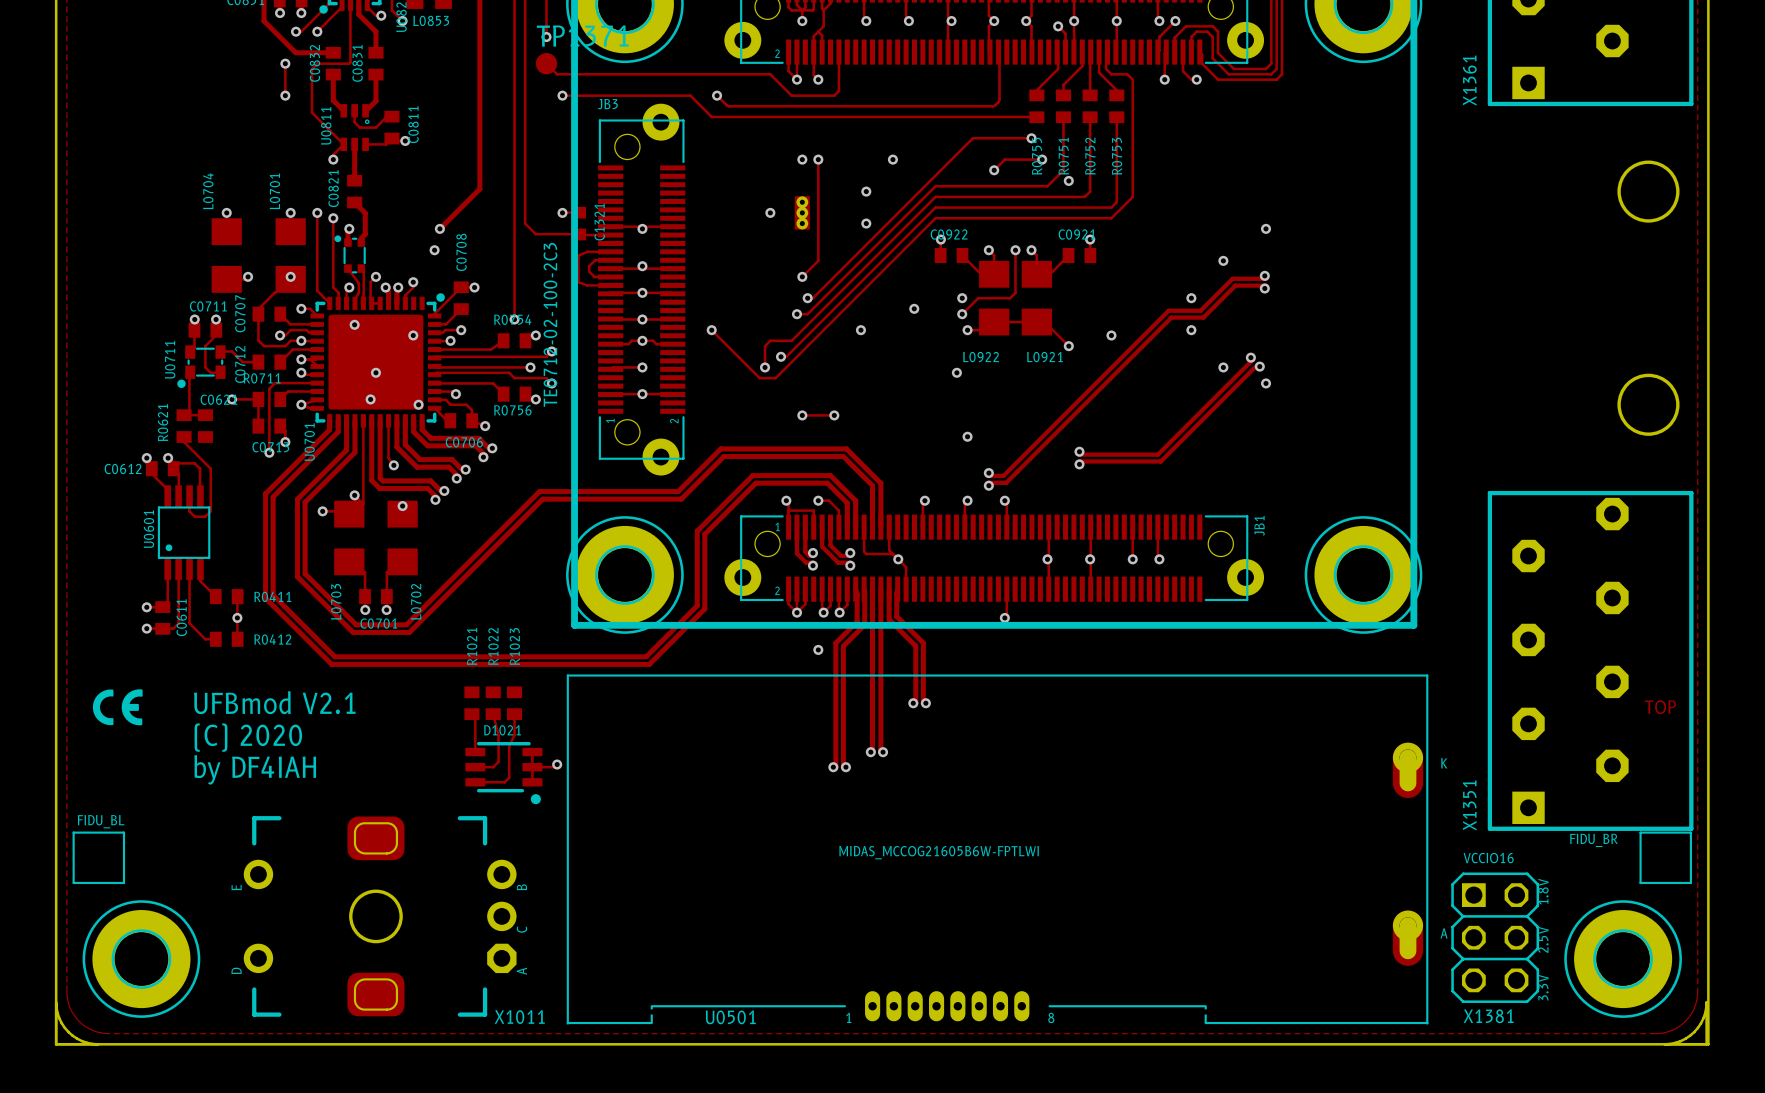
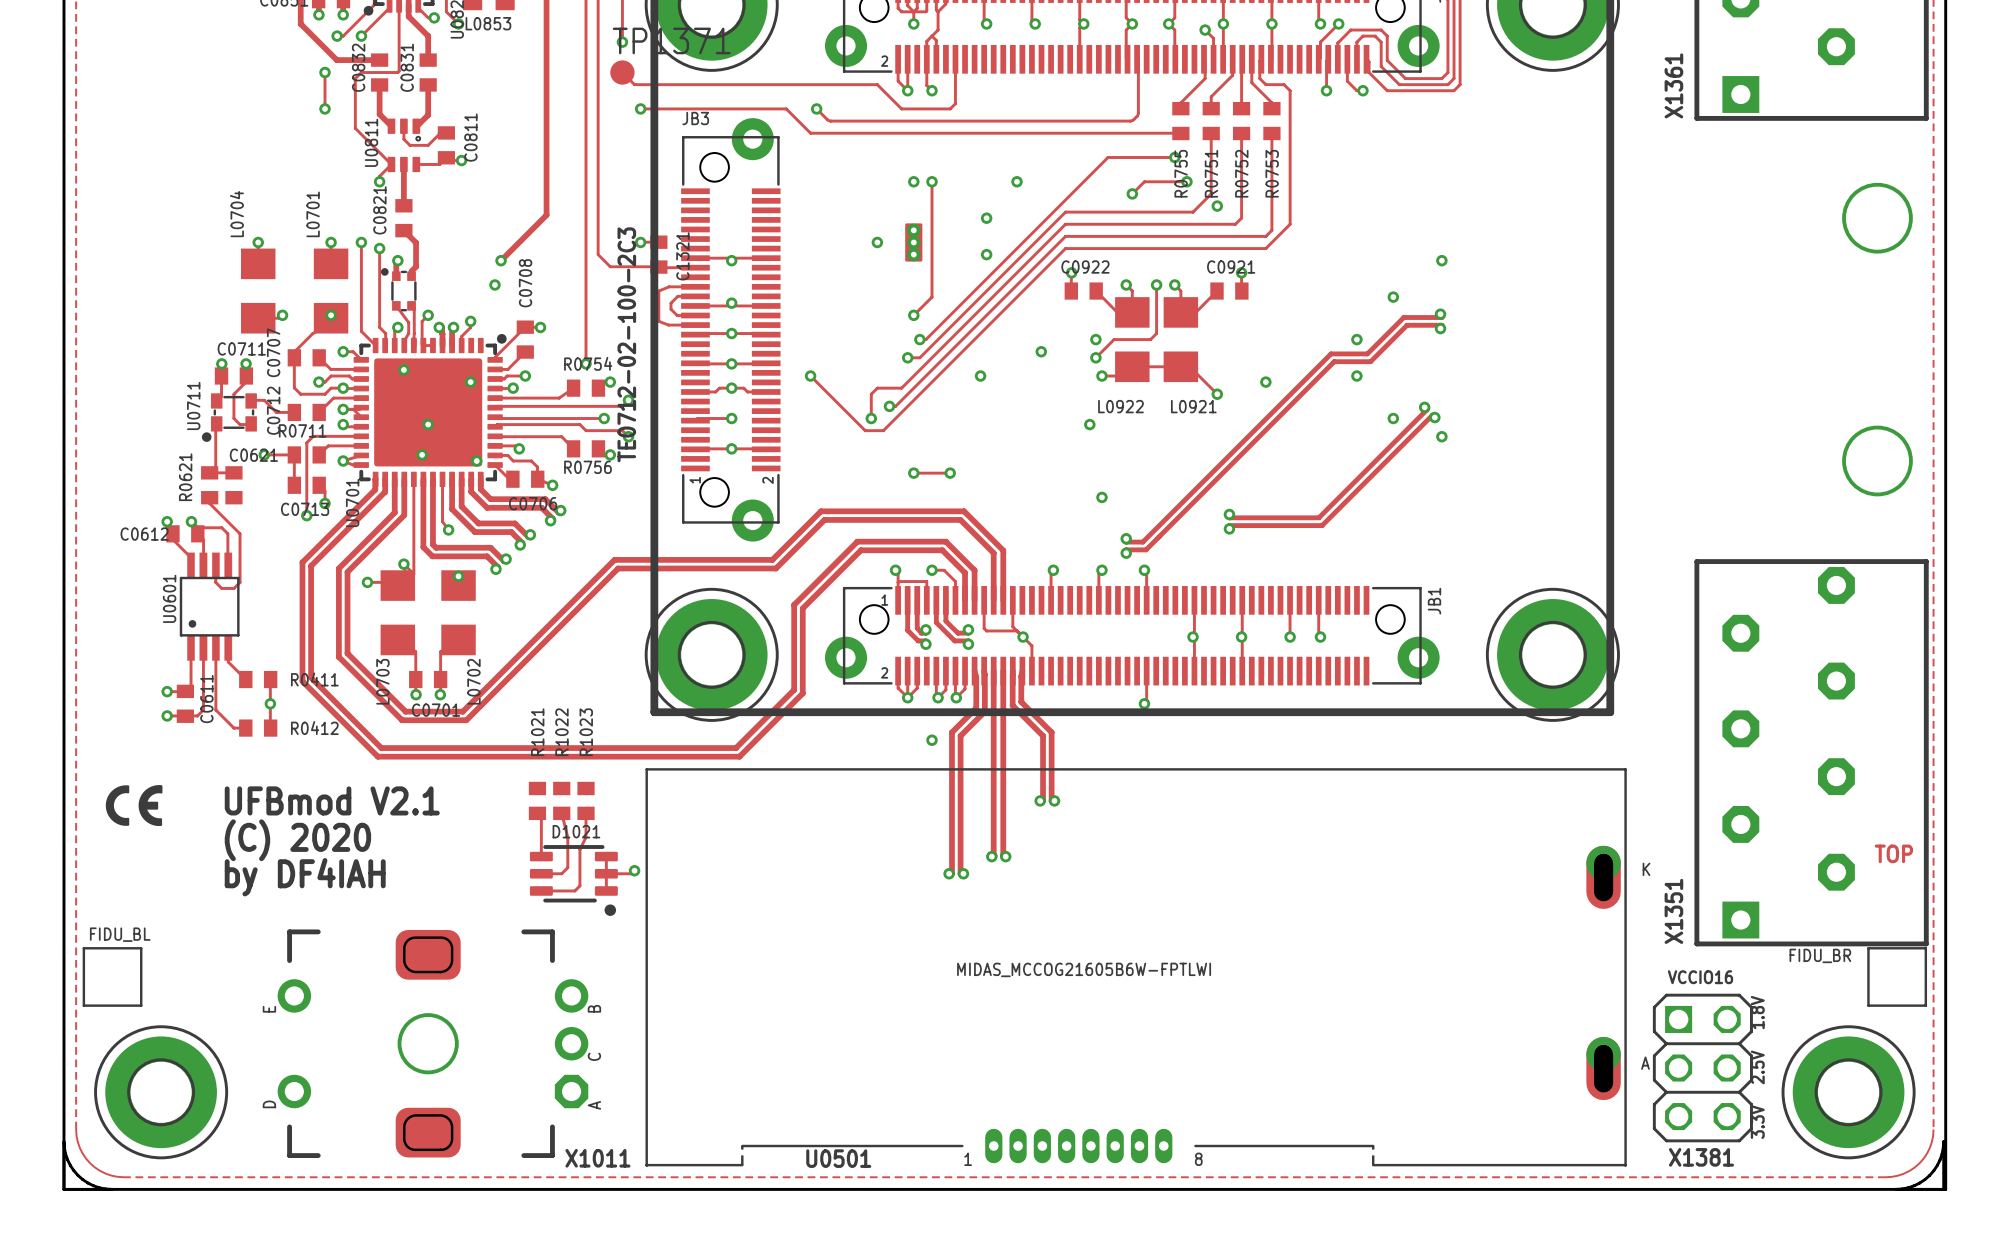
text position: TOP (1660, 707) -> TOP (1893, 853)

